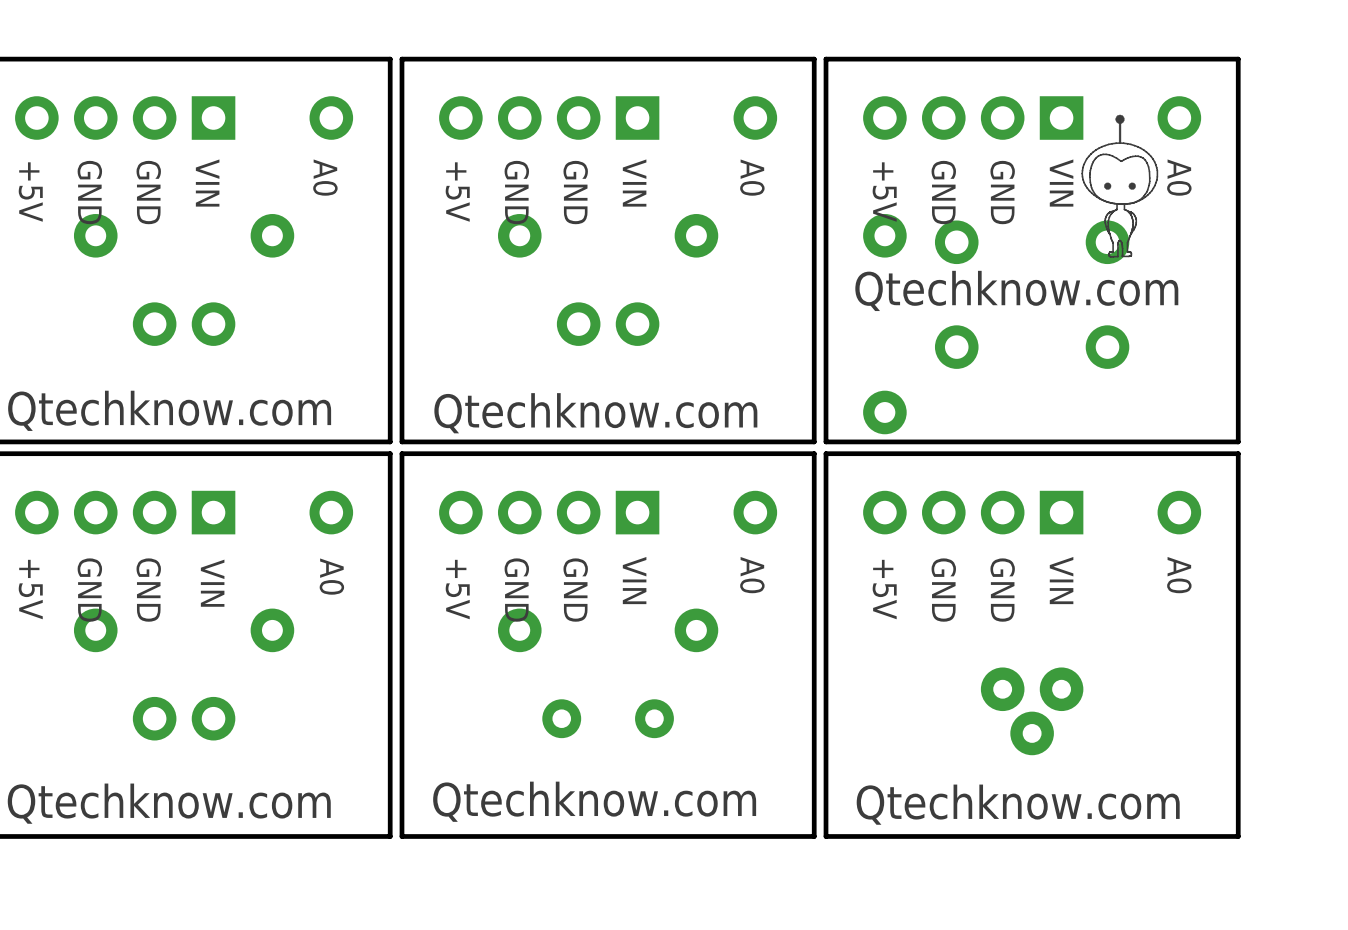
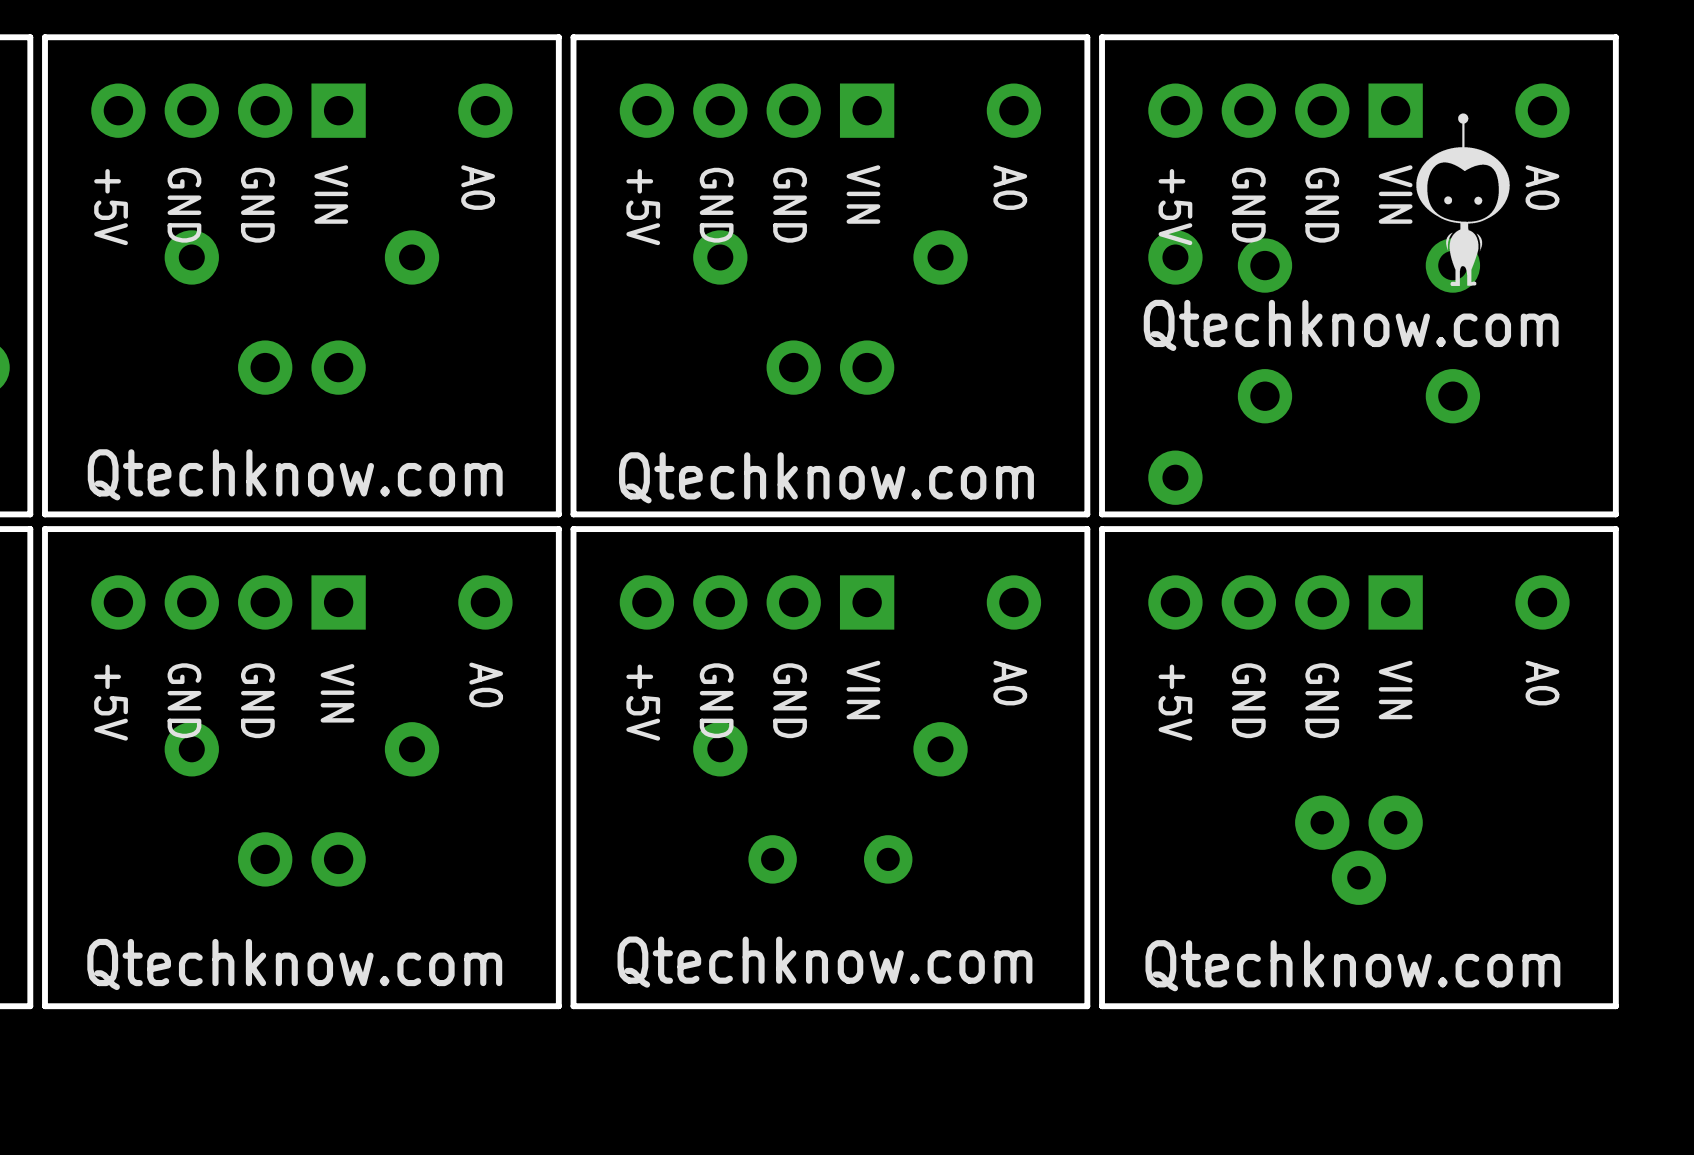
drawing shape: [1081, 114, 1159, 258] -> [1416, 113, 1510, 286]

